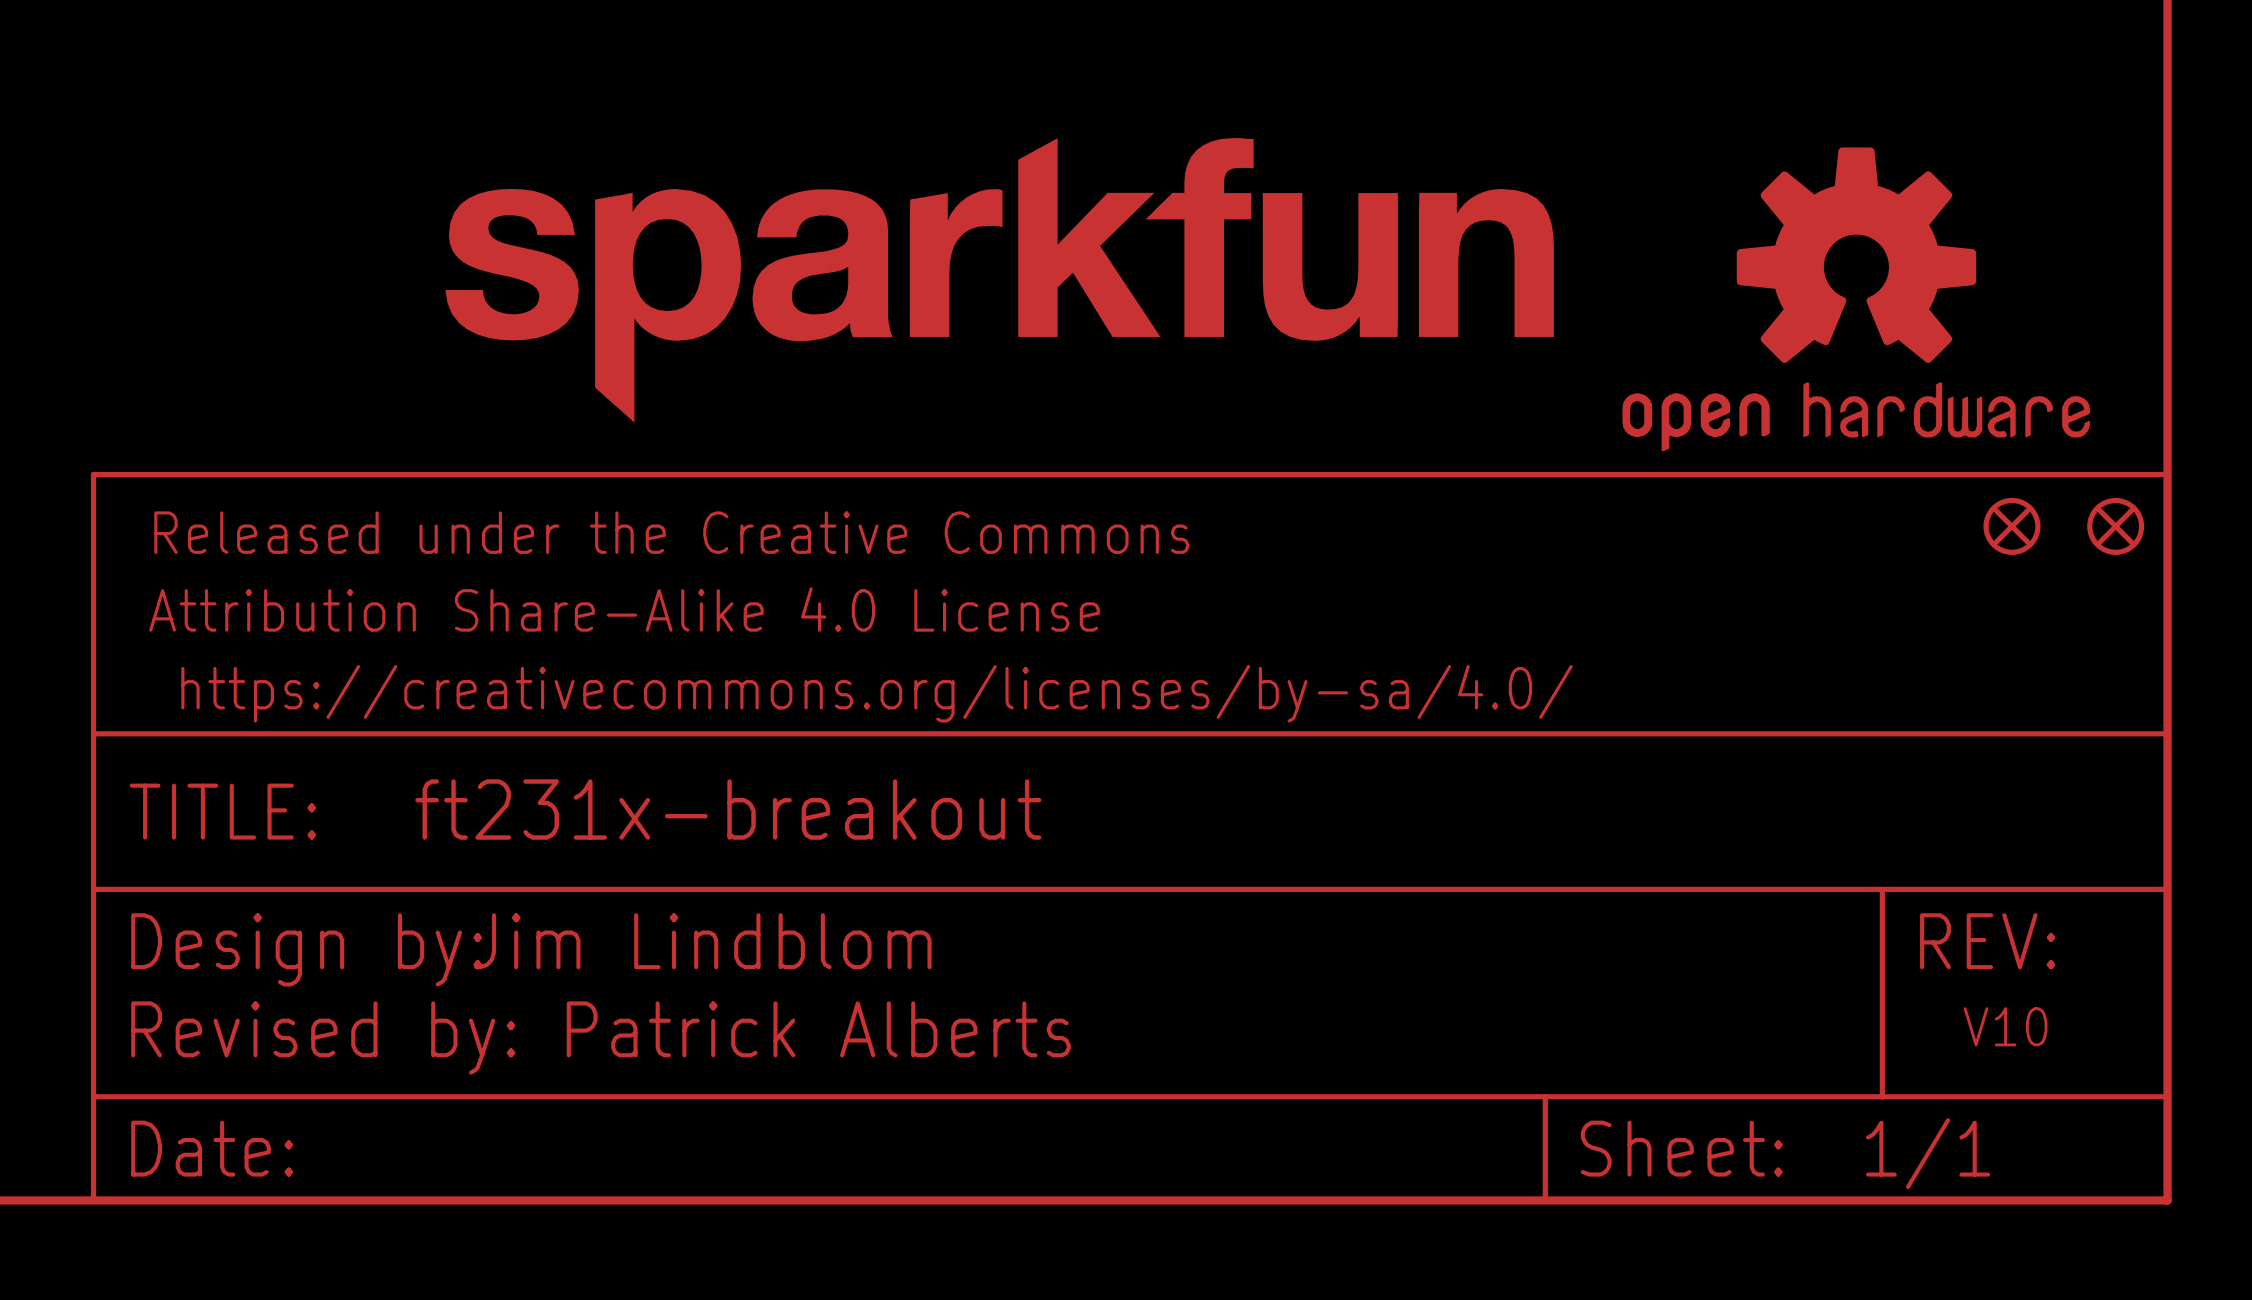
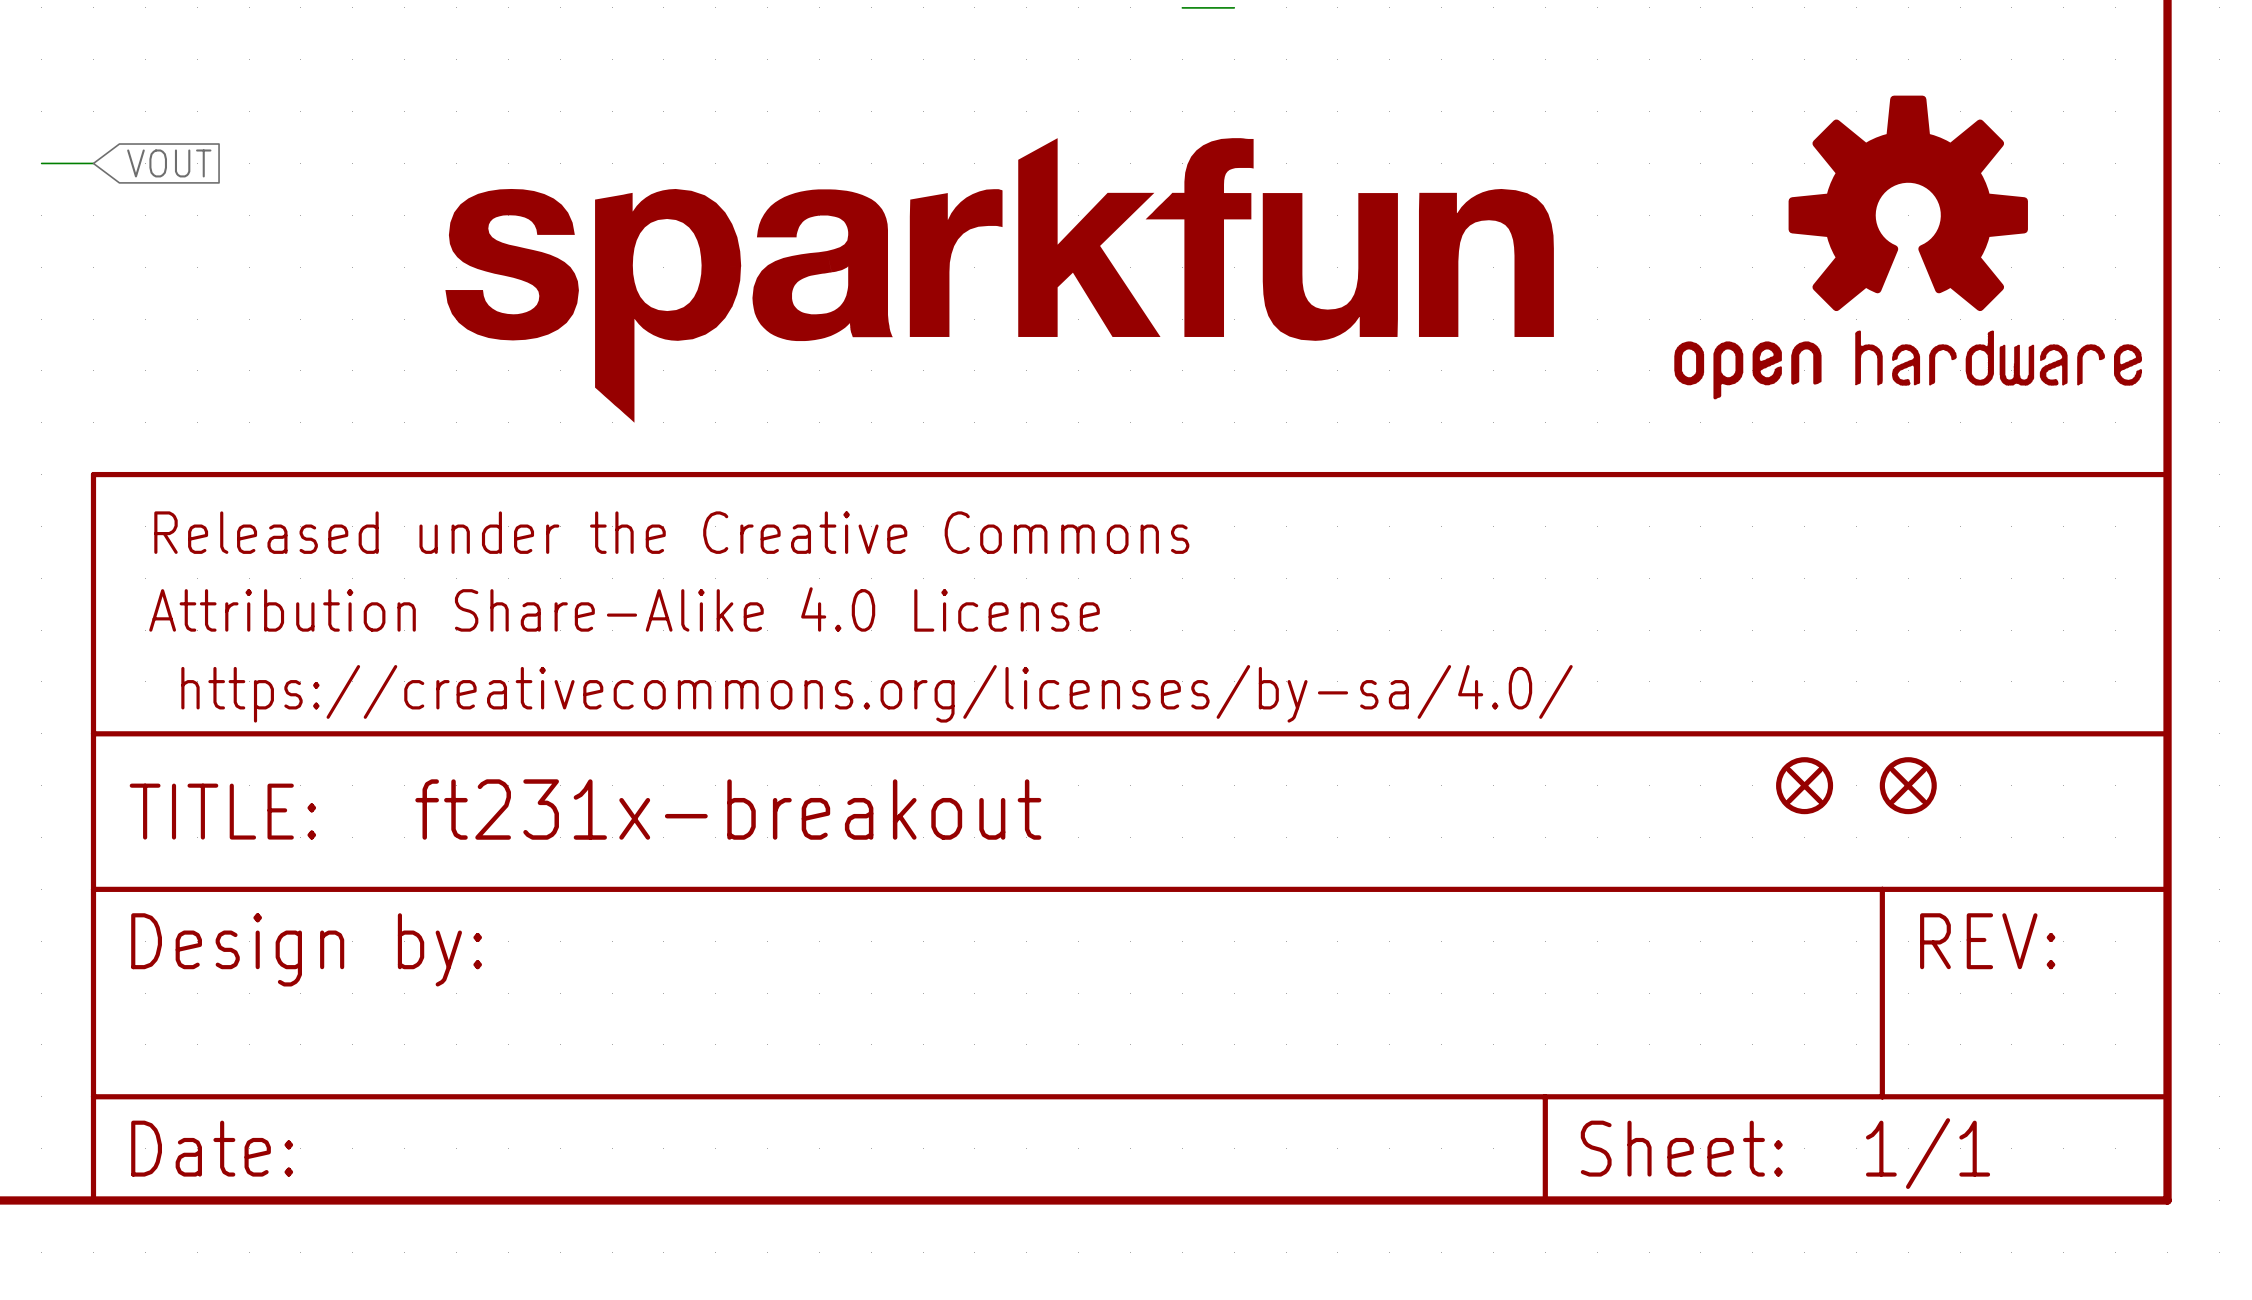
wire: none -> (1182, 7) (1234, 7)
wire: none -> (41, 163) (93, 163)
global label: none -> VOUT (169, 163)
part position: (1856, 299) -> (1908, 247)
part: (2011, 526) -> none
part: (2115, 526) -> none
part: none -> (1804, 785)
part: none -> (1908, 785)
text: Jim Lindblom (702, 941) -> none
text: V10 (2005, 1026) -> none
text: Revised by: Patrick Alberts (601, 1038) -> none

